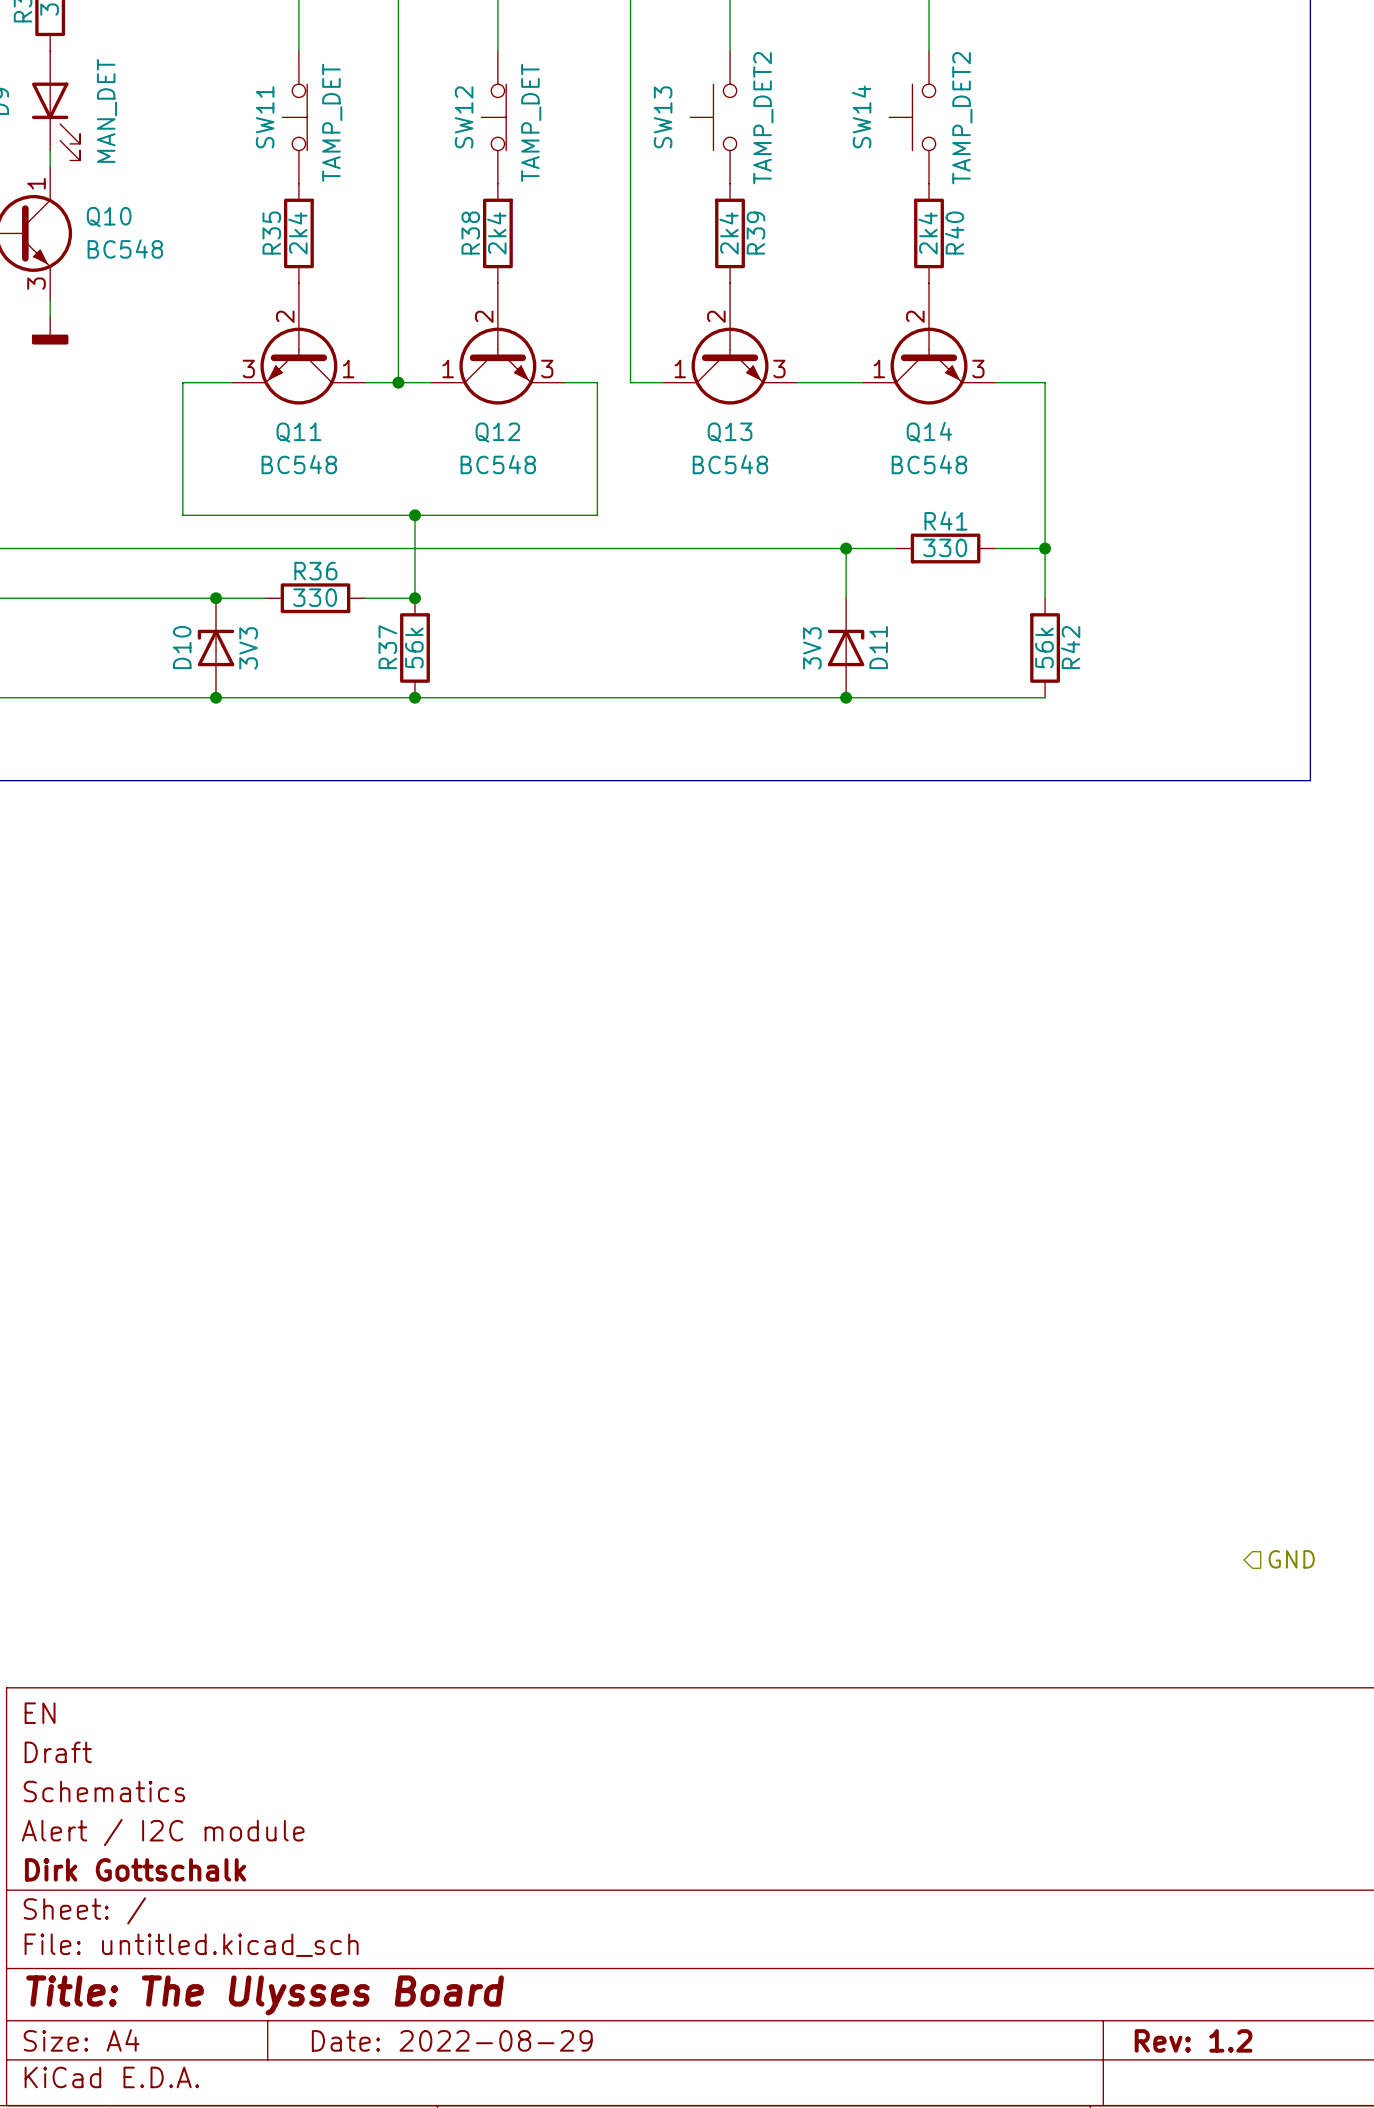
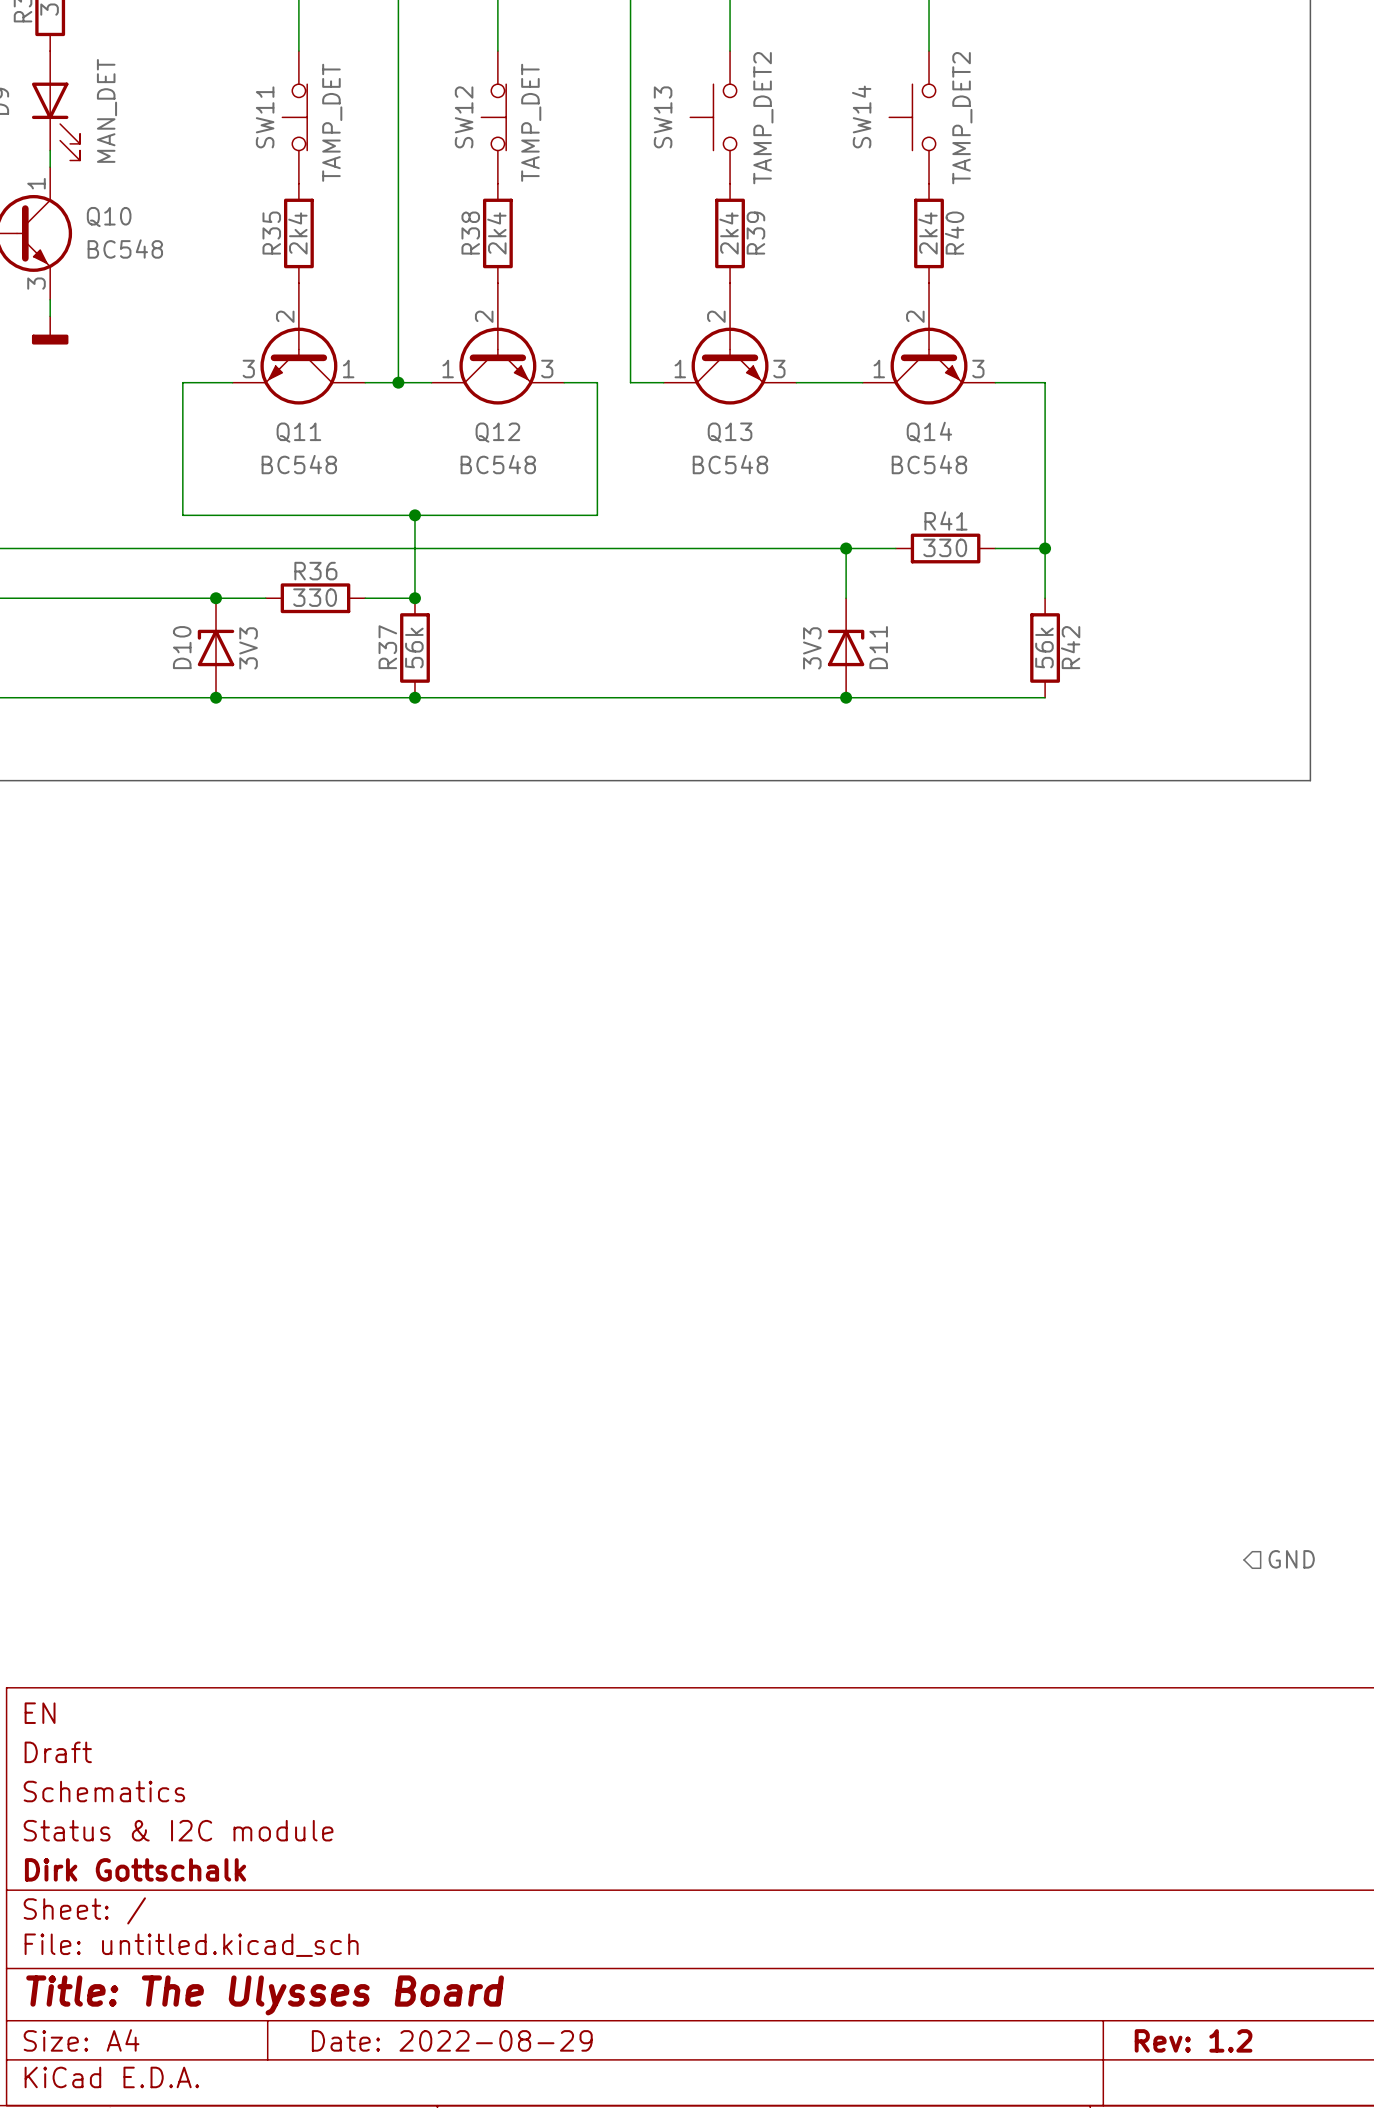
title block: Alert / I2C module (163, 1832) -> Status & I2C module (178, 1830)

